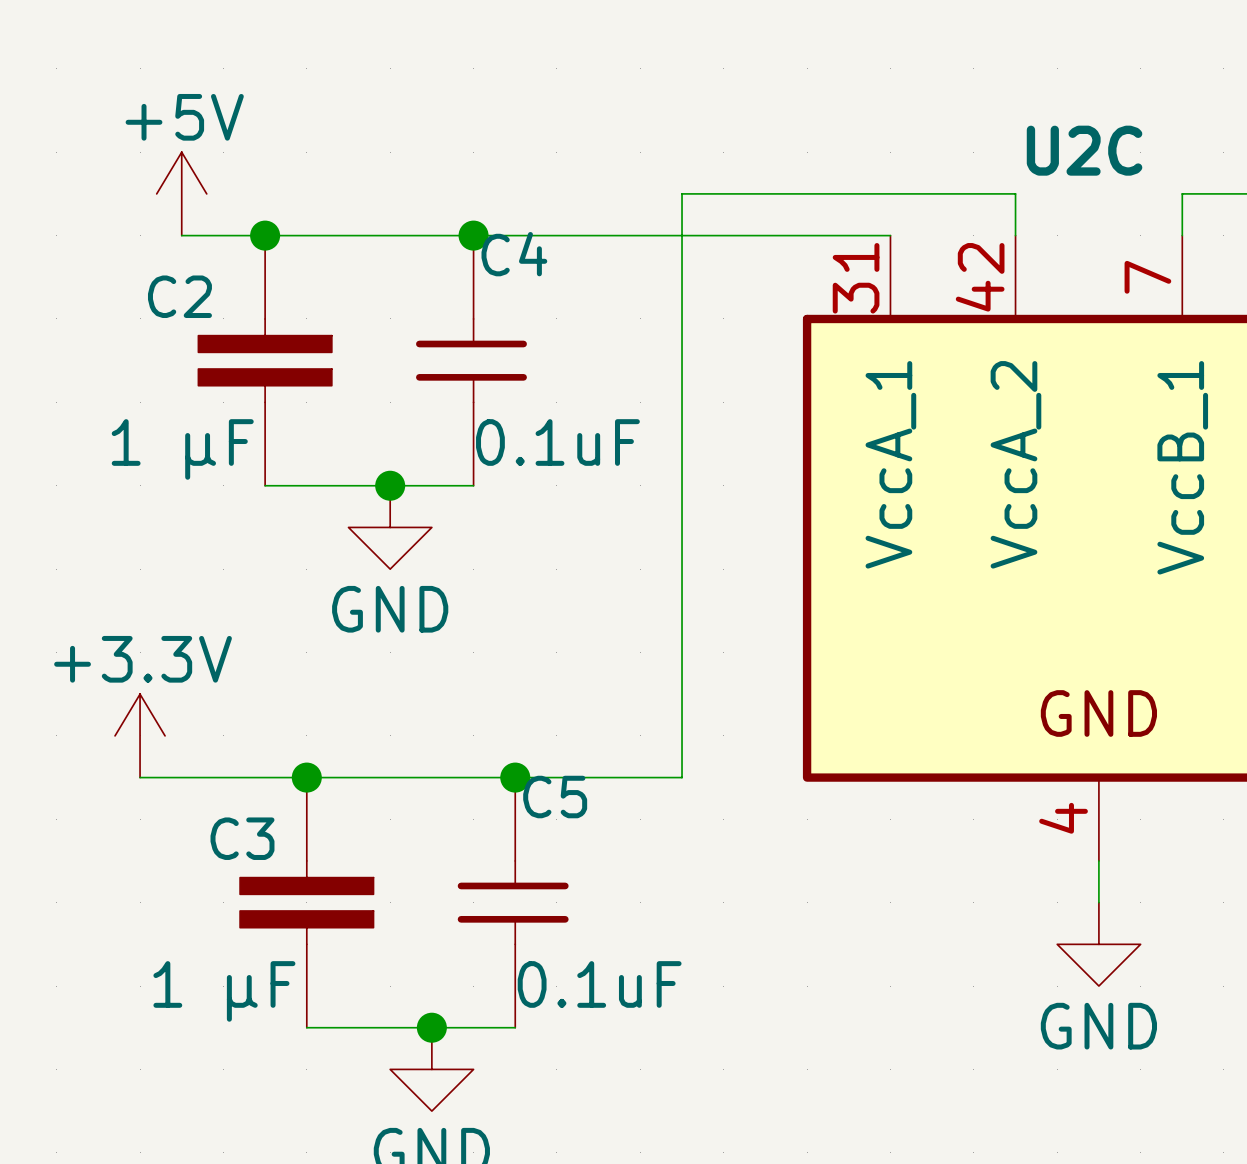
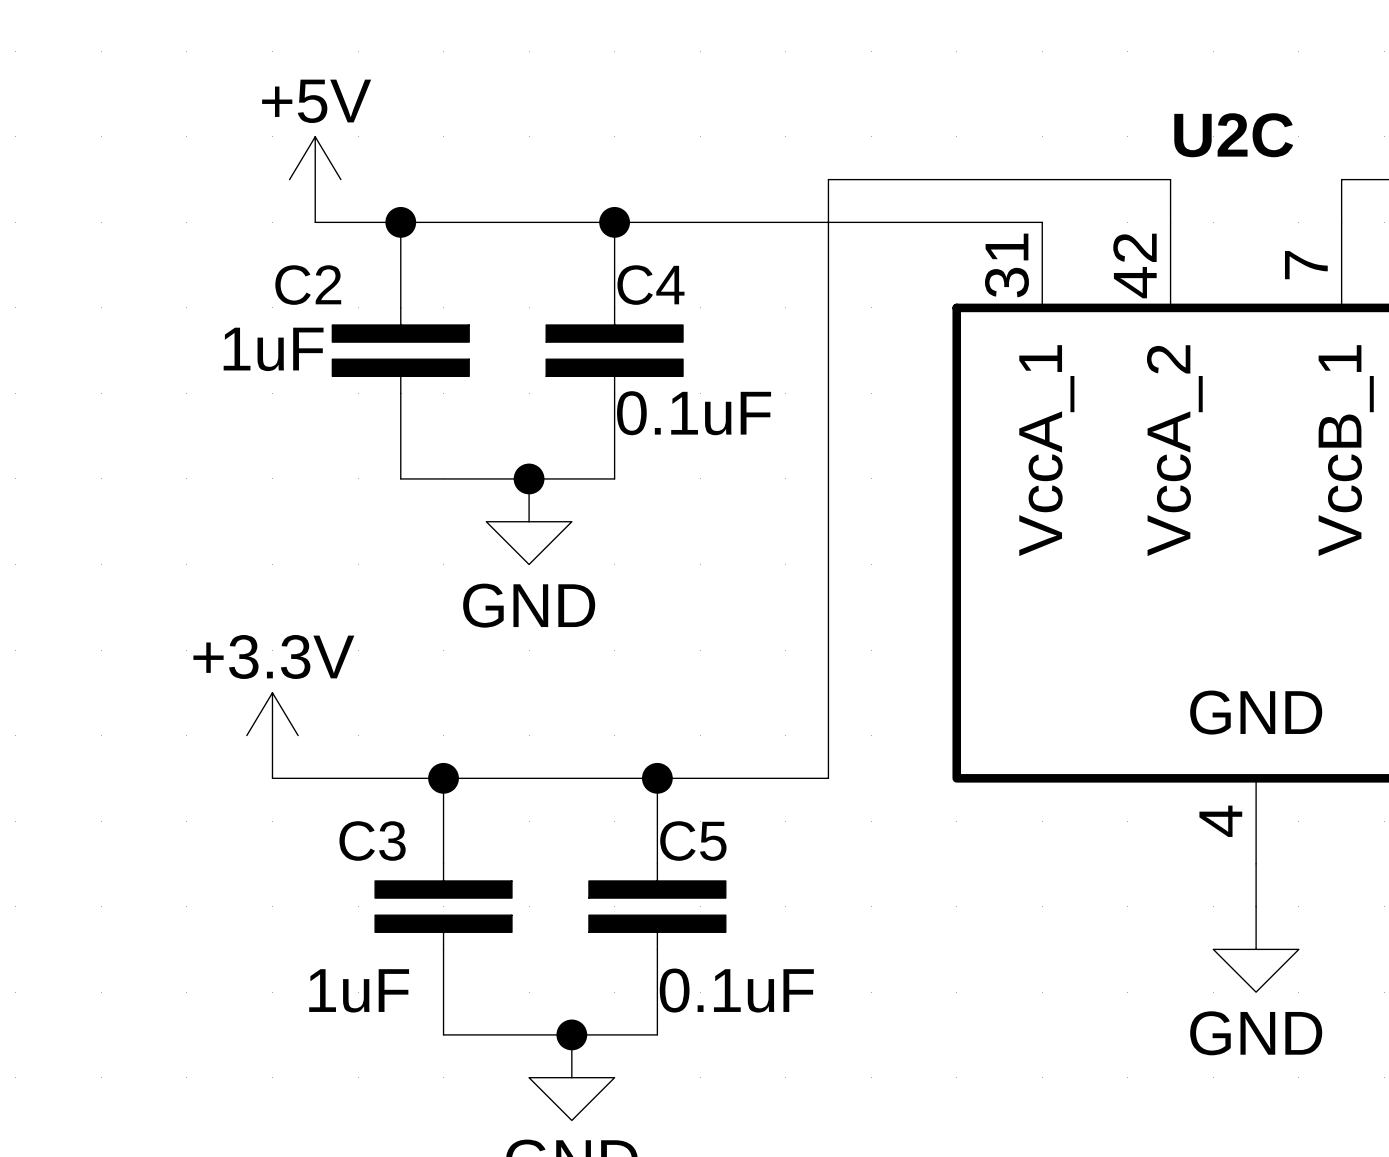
C4 symbol: [416, 235, 527, 486] -> [546, 222, 684, 479]
C4 name position: C4 (514, 254) -> C4 (650, 285)
C2 text: none -> 1uF (273, 349)
C4 text: none -> 0.1uF (694, 413)
C4 text: 0.1uF (557, 442) -> none
C2 text: 1 µF (182, 449) -> none
C5 symbol: [457, 777, 569, 1028] -> [588, 778, 726, 1035]
C5 name position: C5 (555, 797) -> C5 (693, 841)
C3 text: none -> 1uF (359, 990)
C5 text: 0.1uF (599, 984) -> none
C5 text: none -> 0.1uF (736, 990)
C3 text: 1 µF (224, 991) -> none

